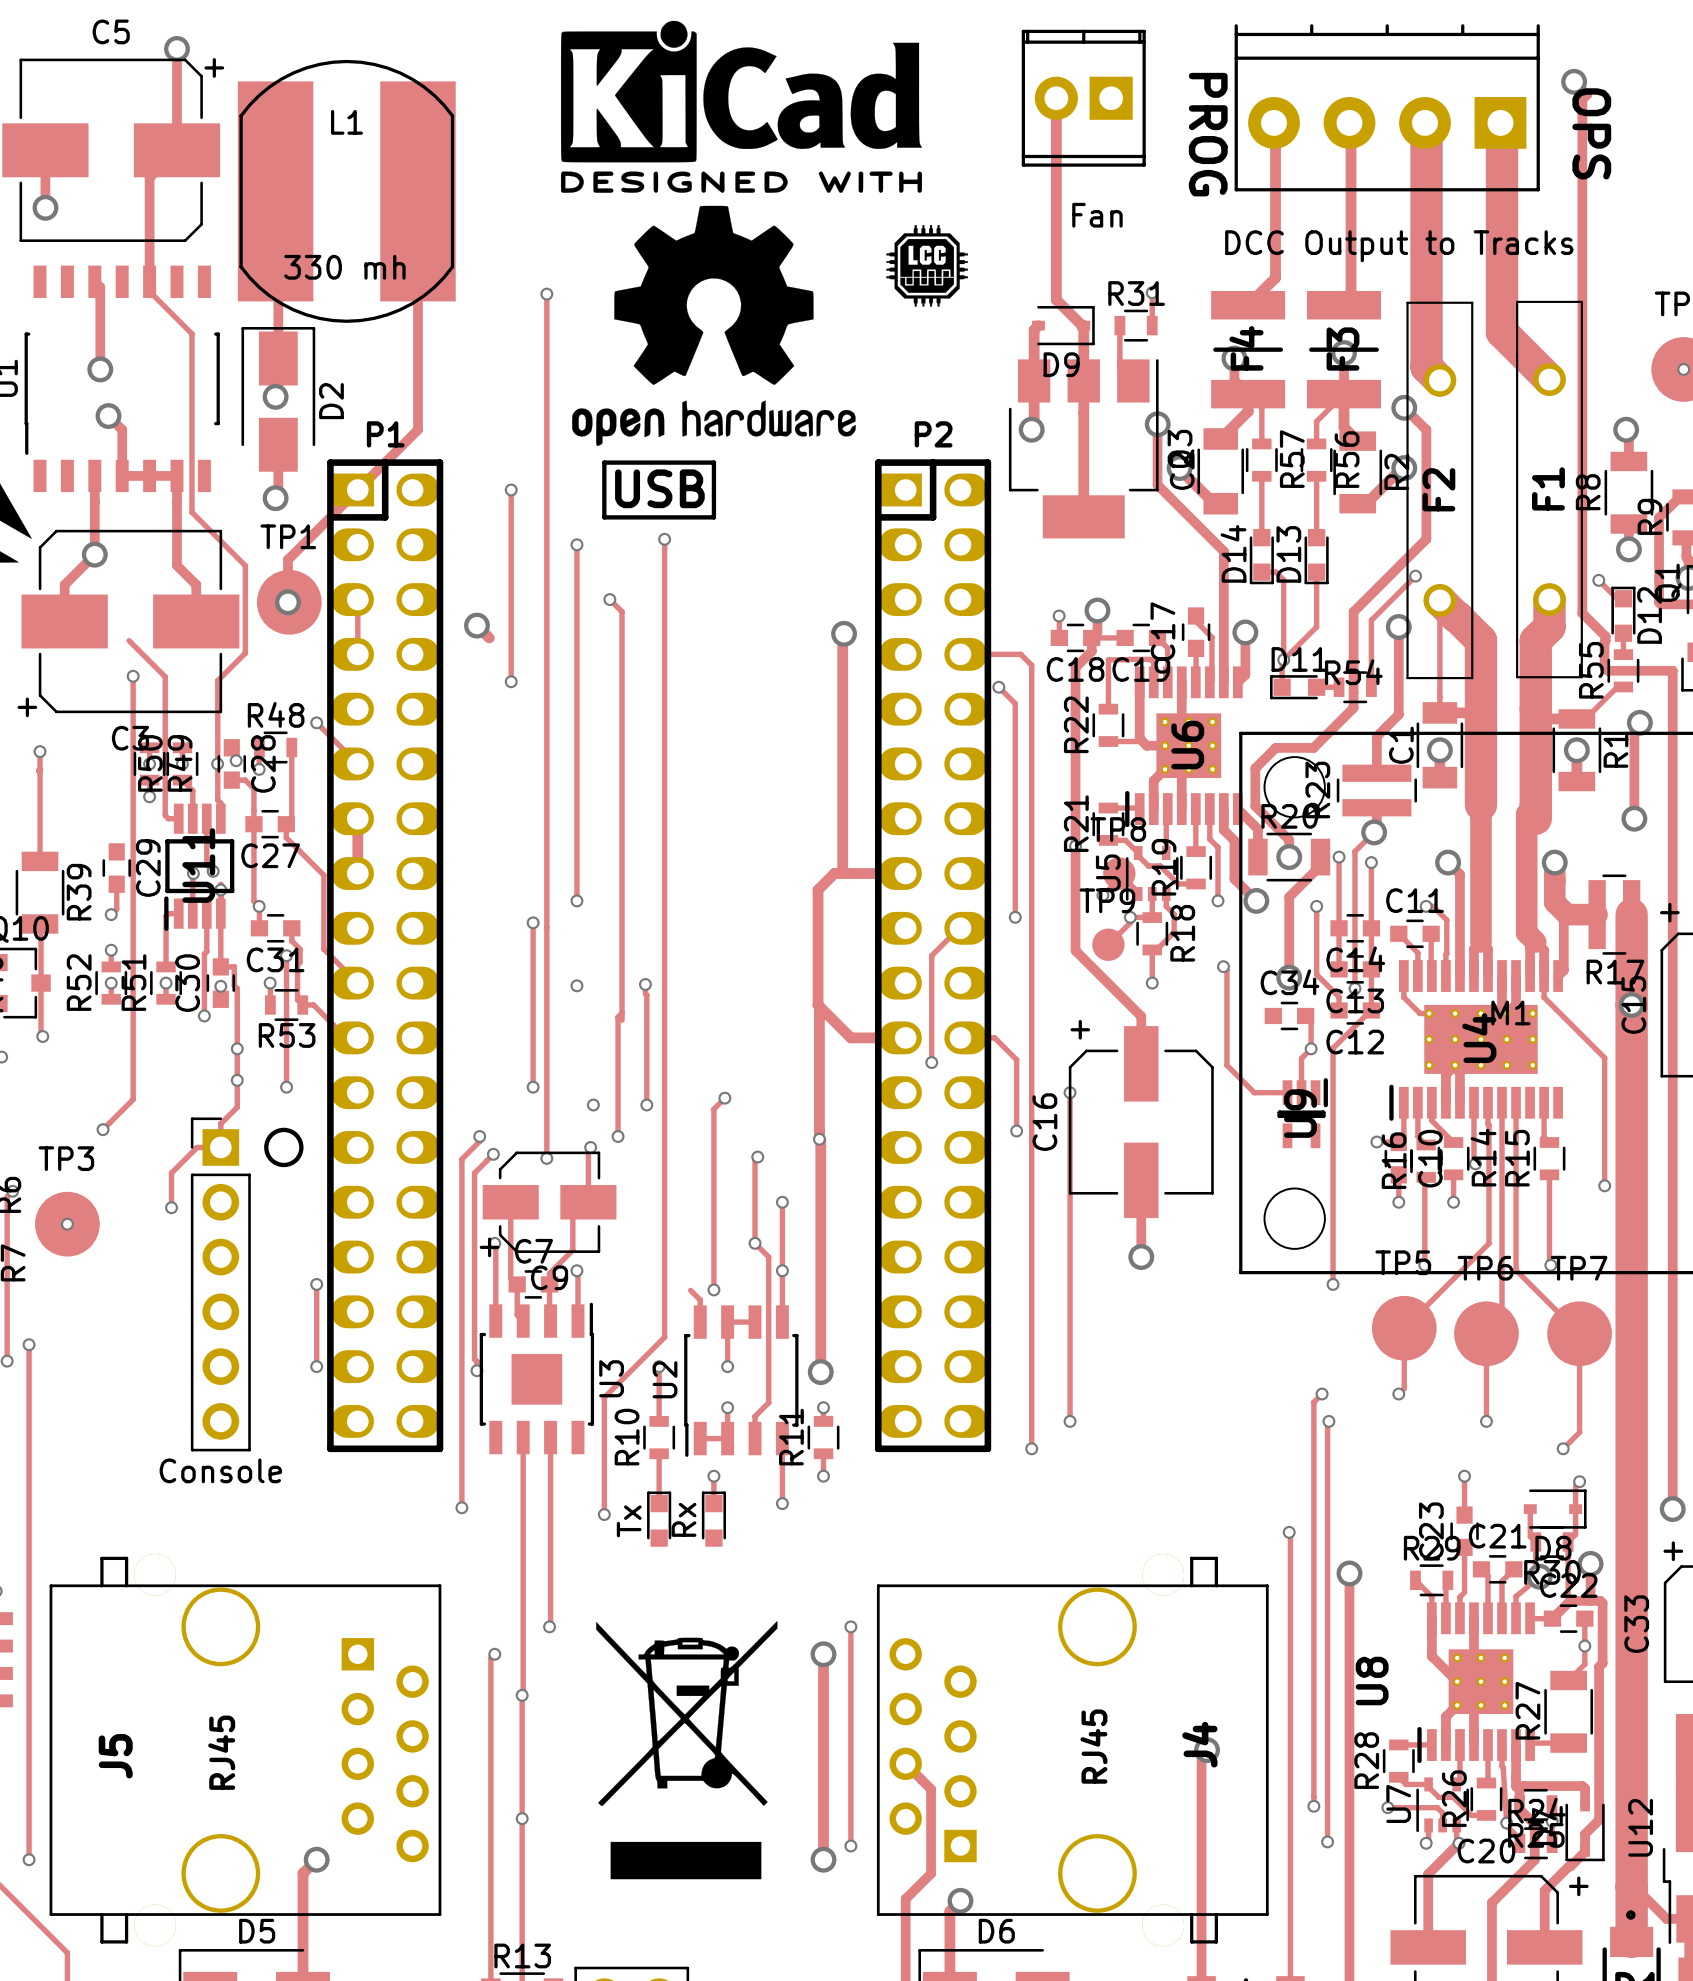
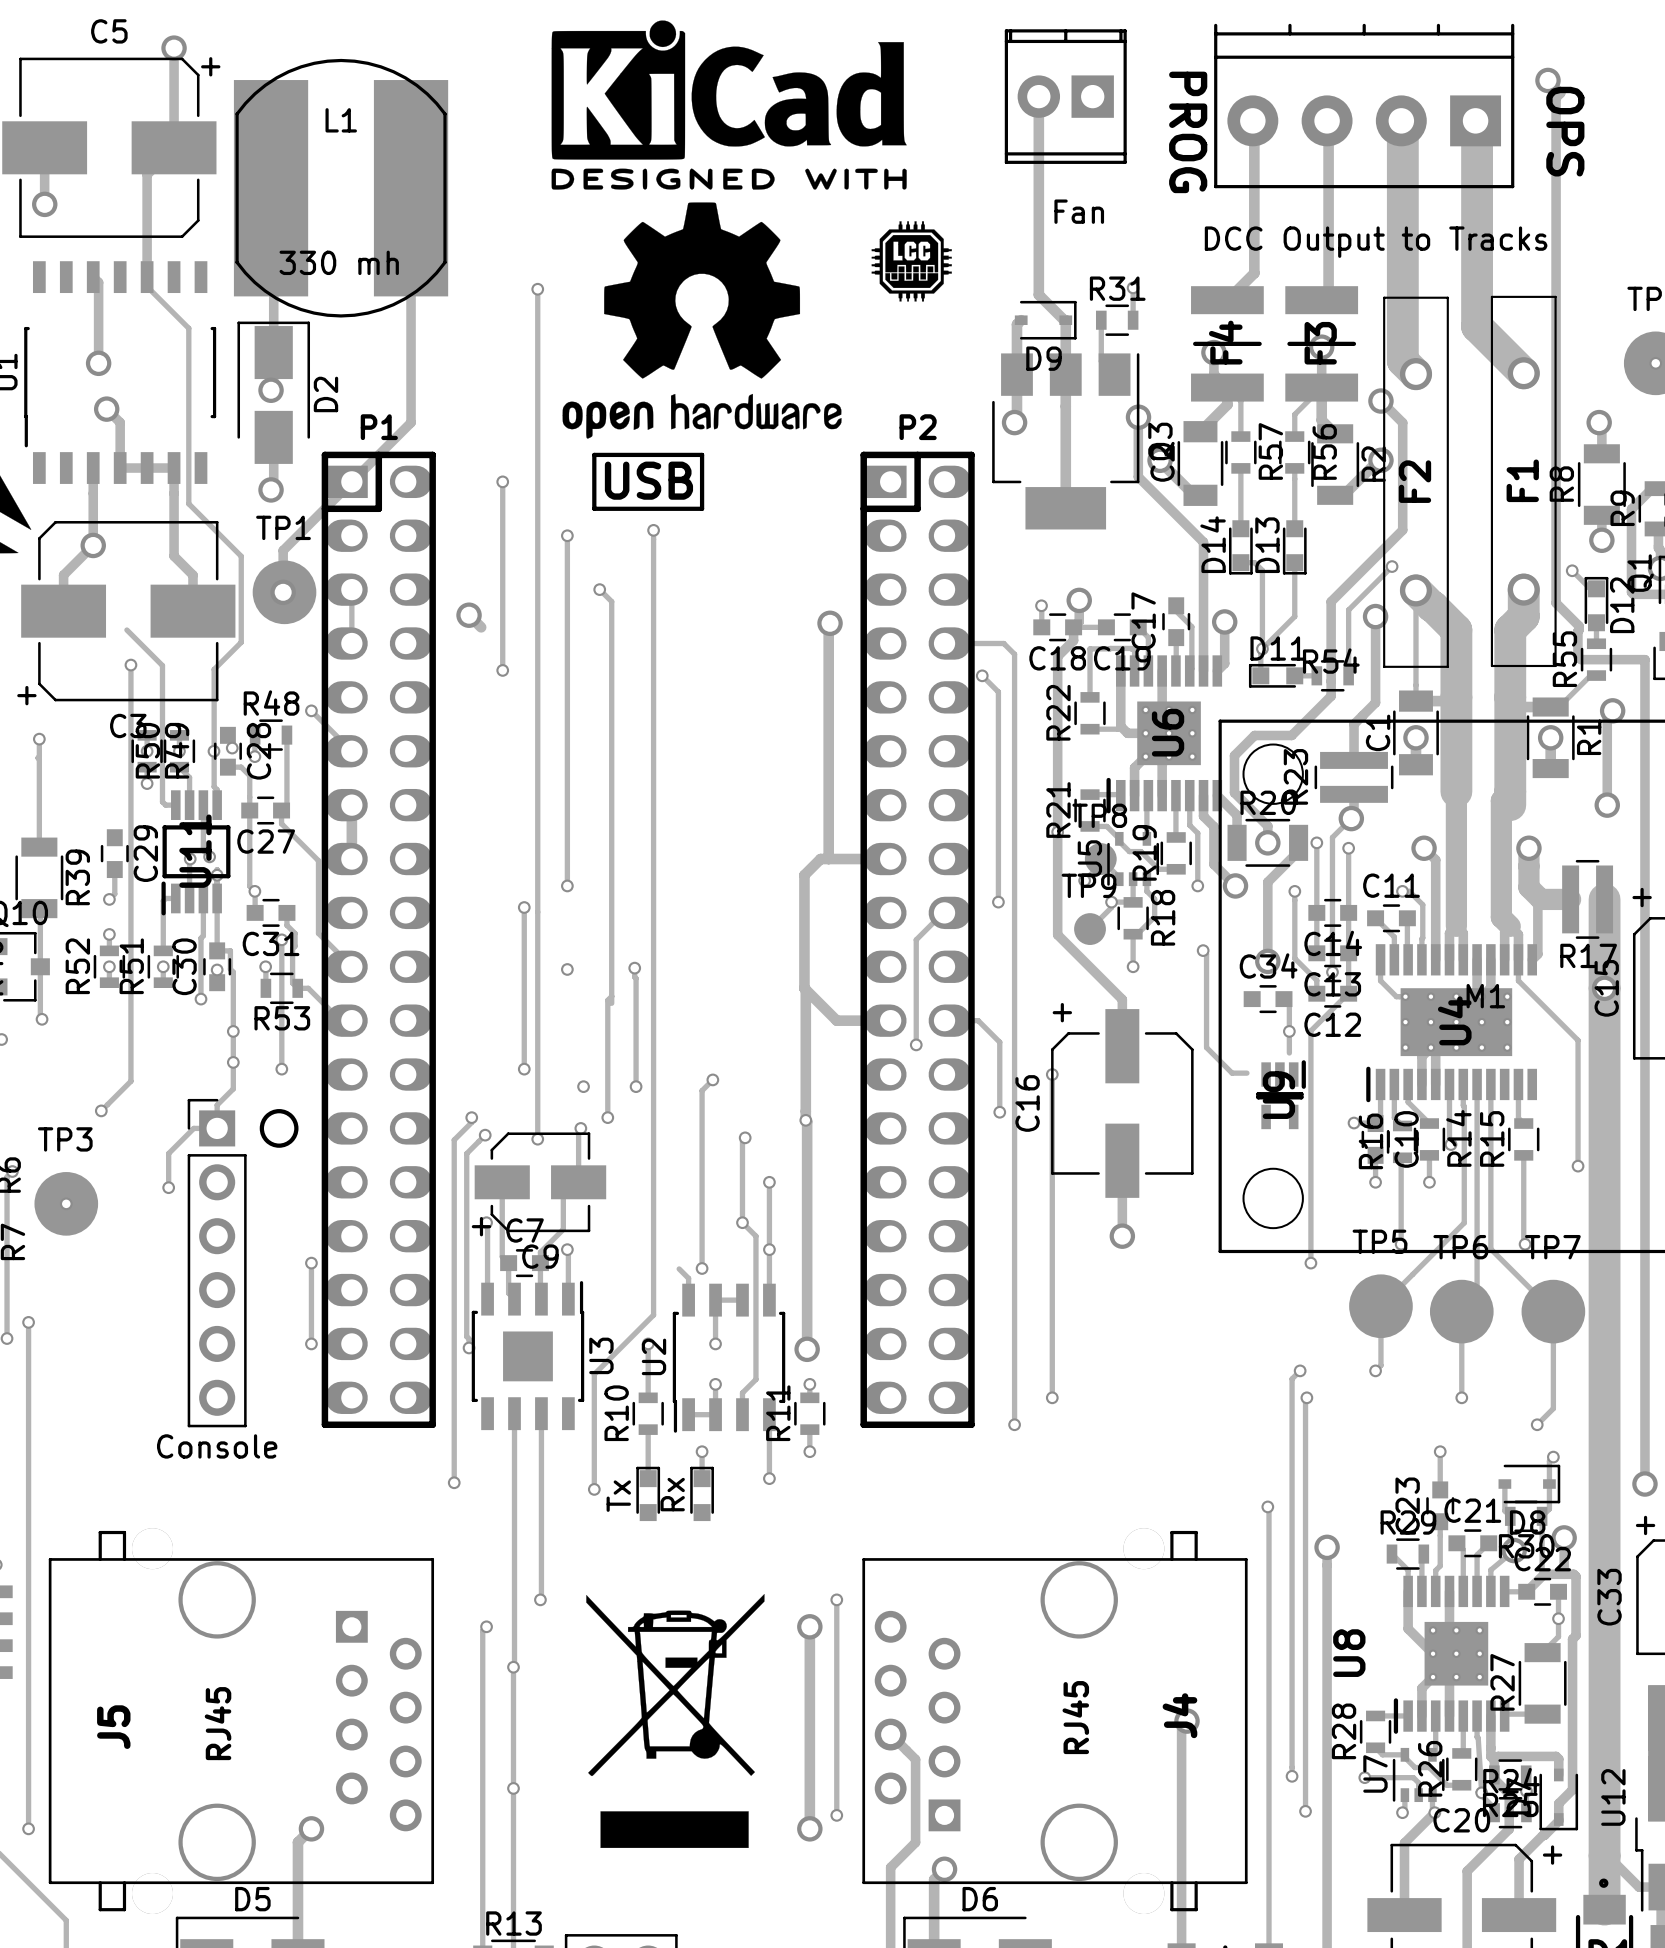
track: (1311, 1048) (1301, 1058) (1301, 1092) -> (1289, 1031) (1289, 1052)
track: (1252, 1091) (1287, 1092) -> (1232, 1073) (1246, 1073)

